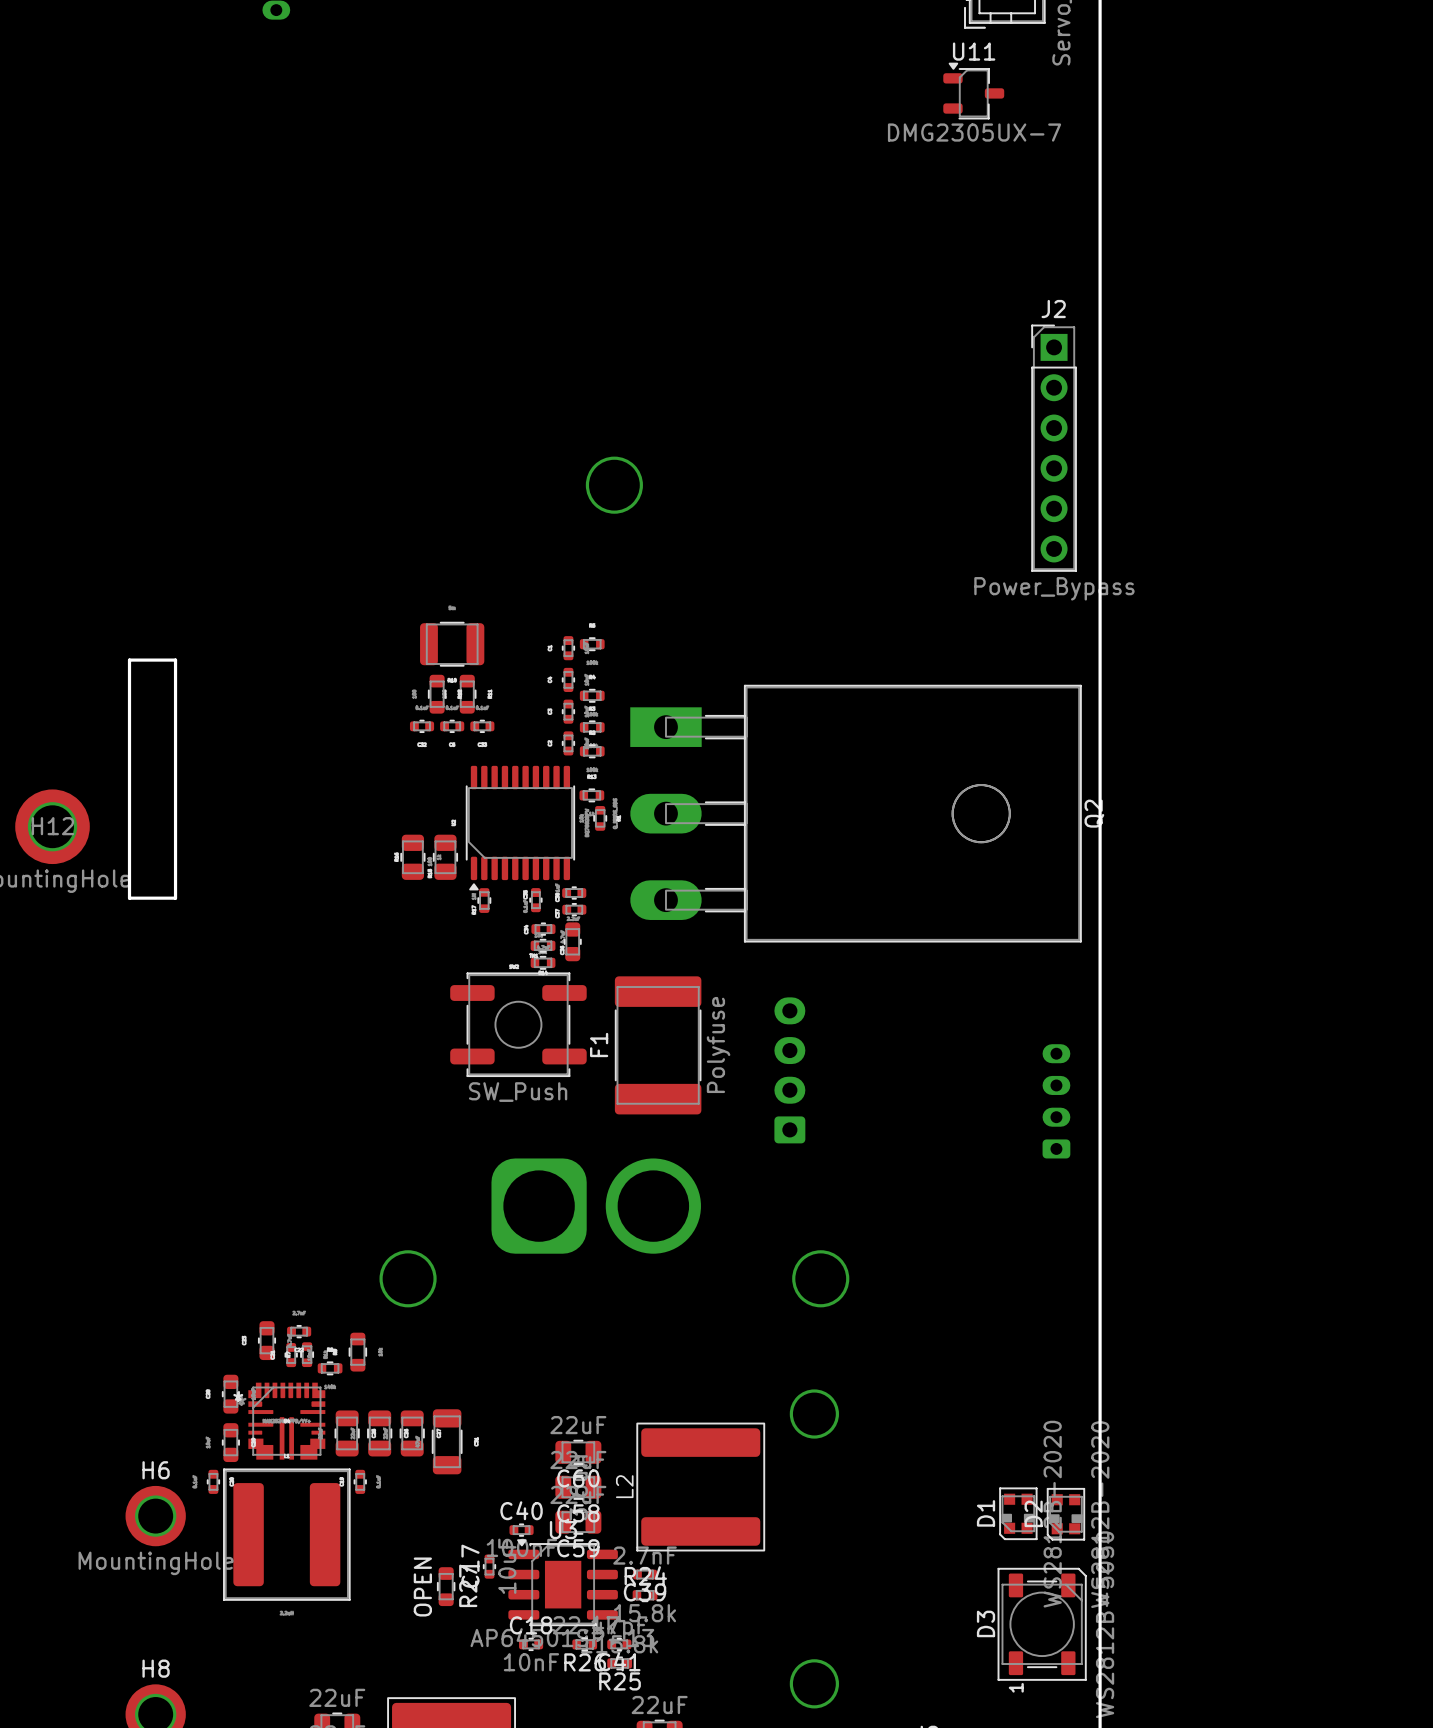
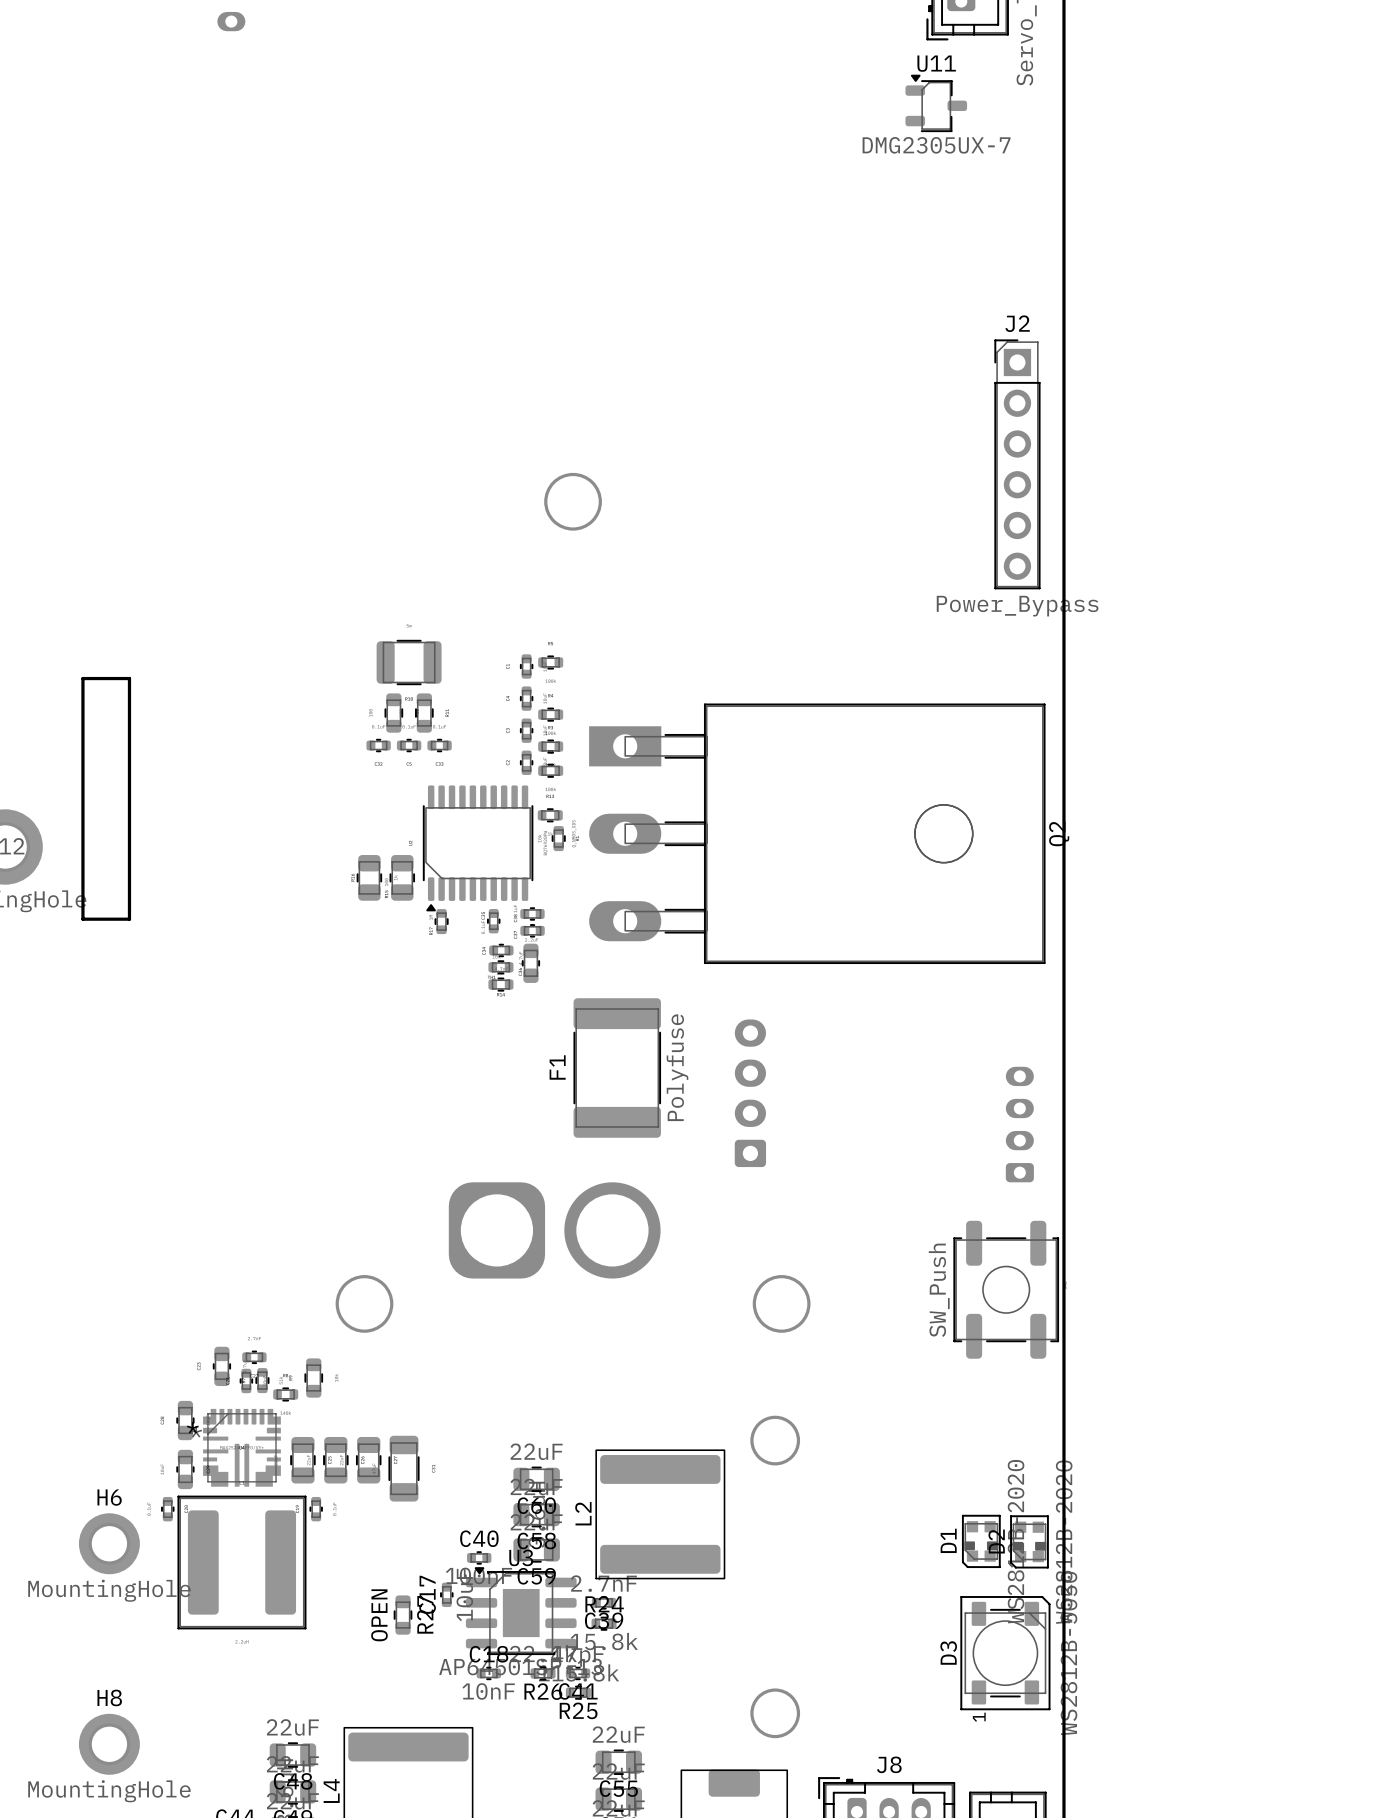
part rotation: 0° (518, 1024) -> 90° clockwise (1006, 1289)
part position: (518, 1024) -> (1006, 1289)

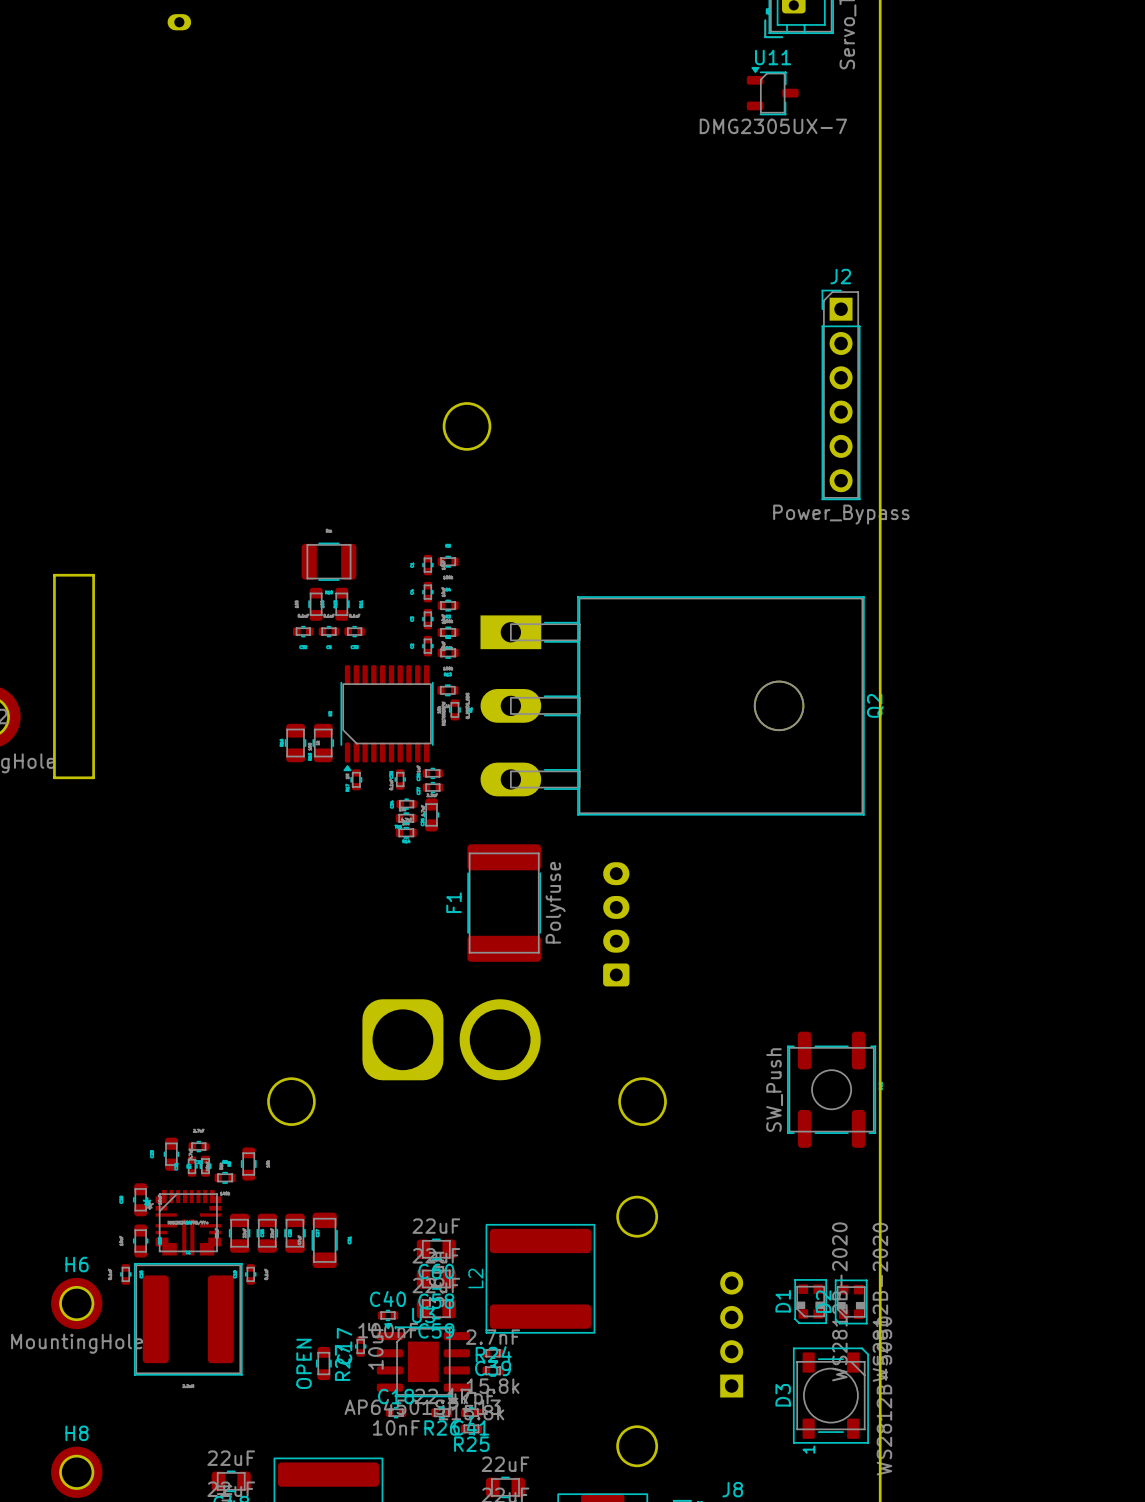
part: (1019, 1124) -> none
part: none -> (731, 1334)

